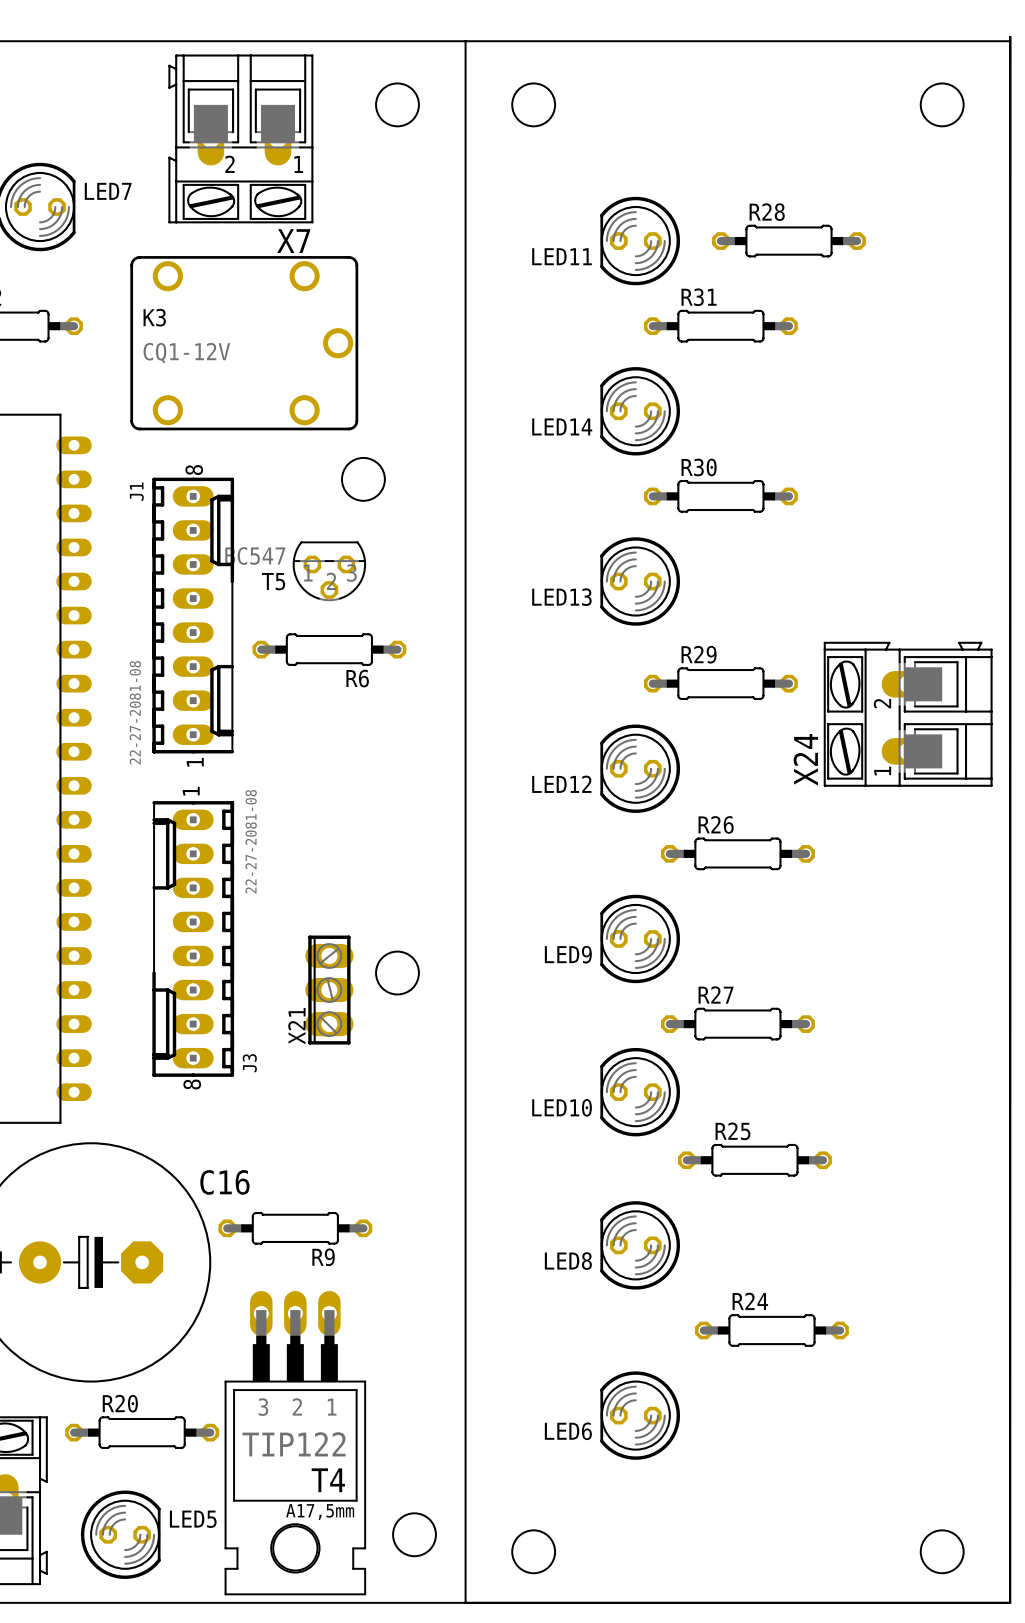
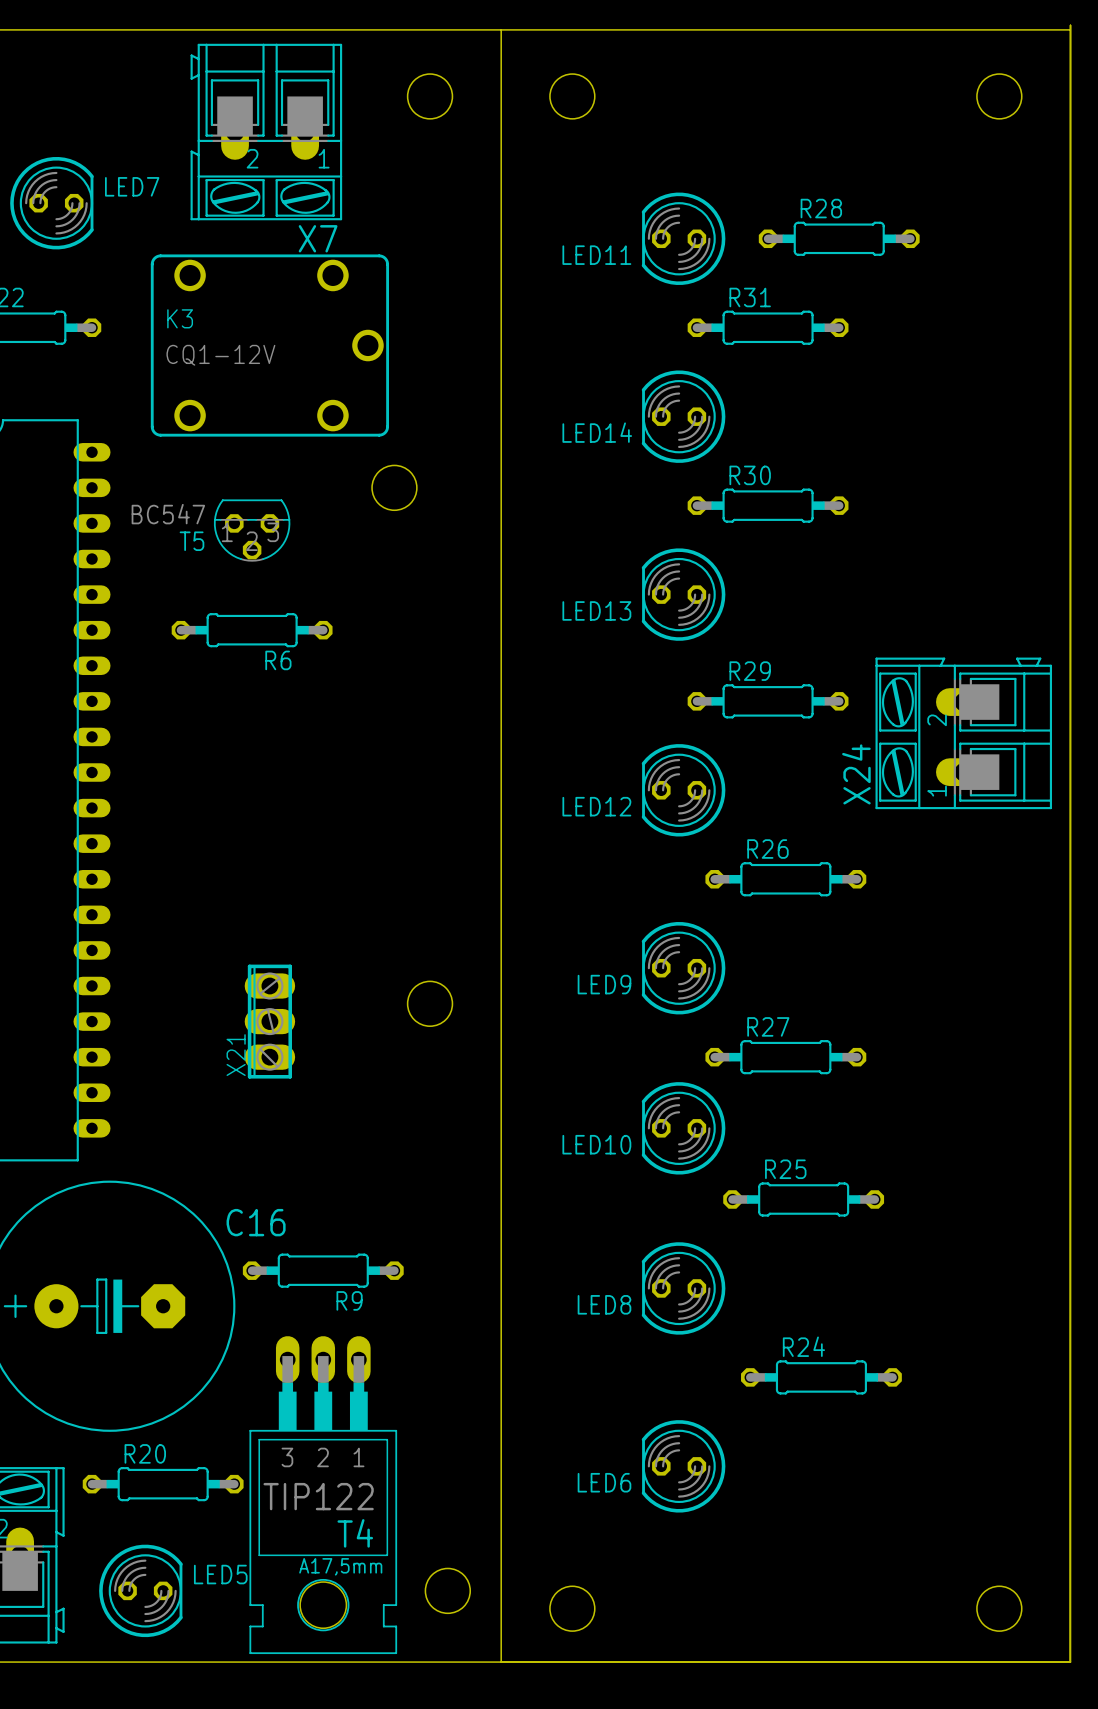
T5 position: (329, 571) -> (252, 530)
J1: 22-27-2081-08 (193, 615) -> none
R6 position: (329, 649) -> (252, 630)
J3: 22-27-2081-08 (193, 938) -> none
X21 position: (329, 990) -> (269, 1021)

